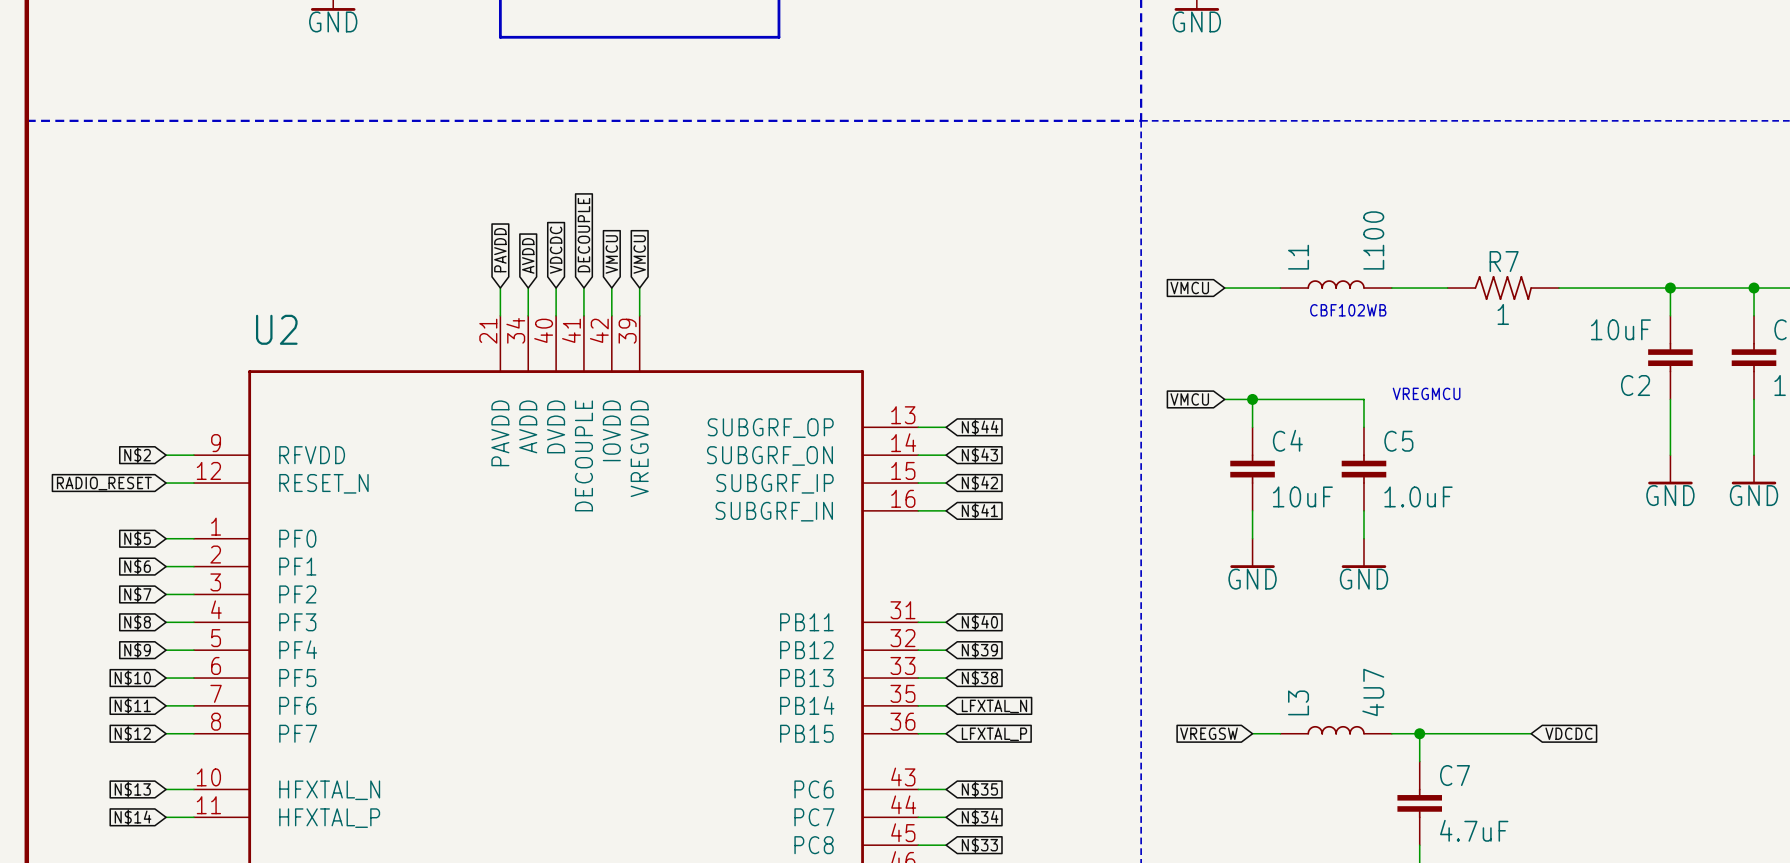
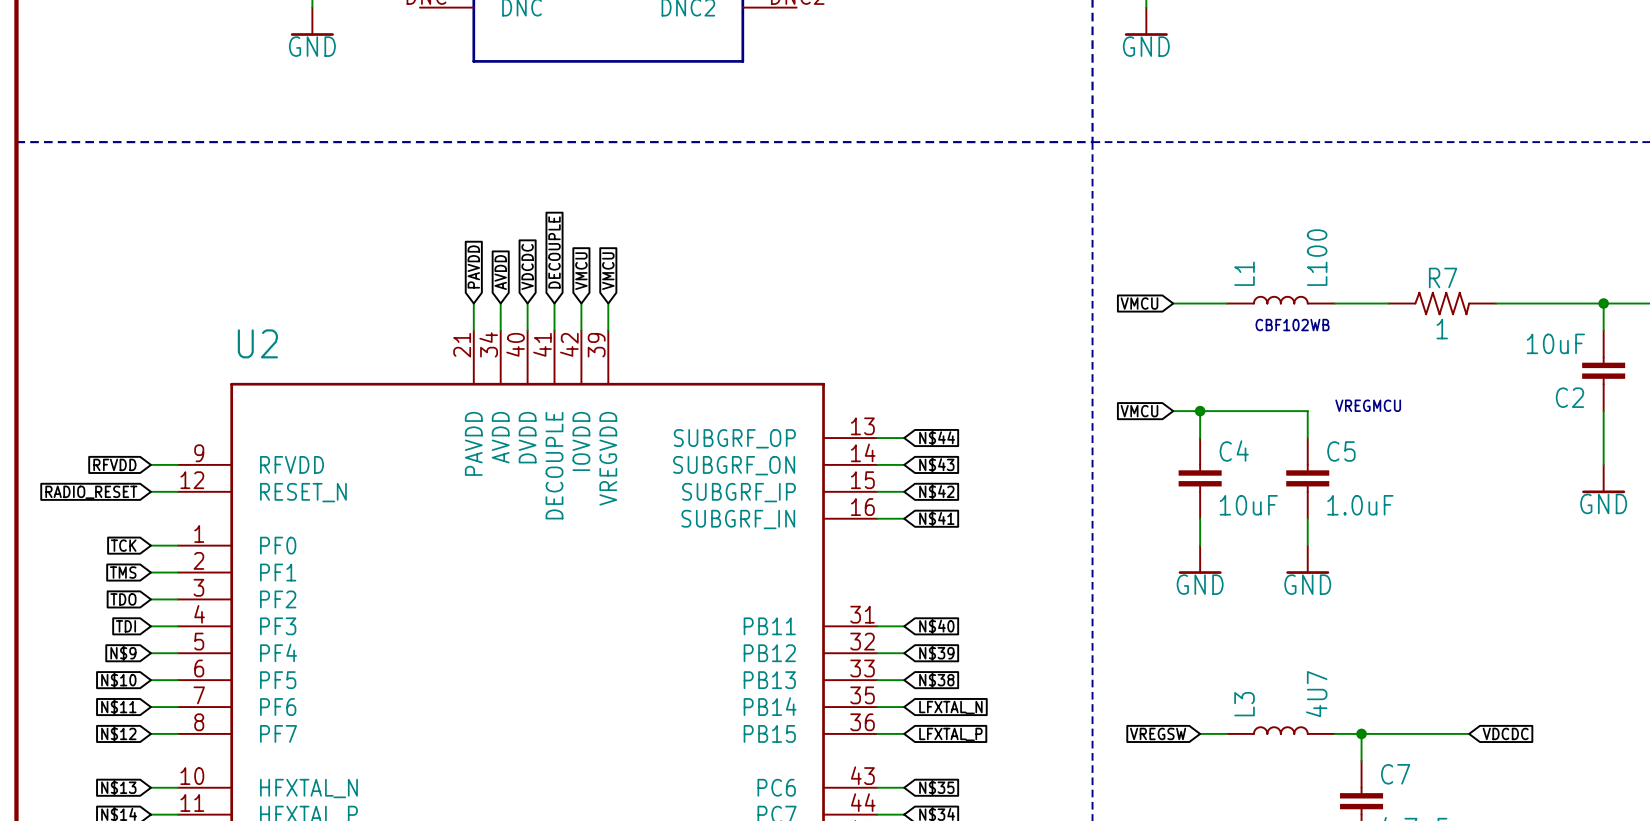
global label: N$2 (137, 455) -> RFVDD (114, 464)
global label: N$5 (137, 538) -> TCK (123, 545)
global label: N$6 (137, 566) -> TMS (123, 572)
global label: N$7 (137, 594) -> TDO (123, 599)
global label: N$8 (137, 622) -> TDI (125, 626)

